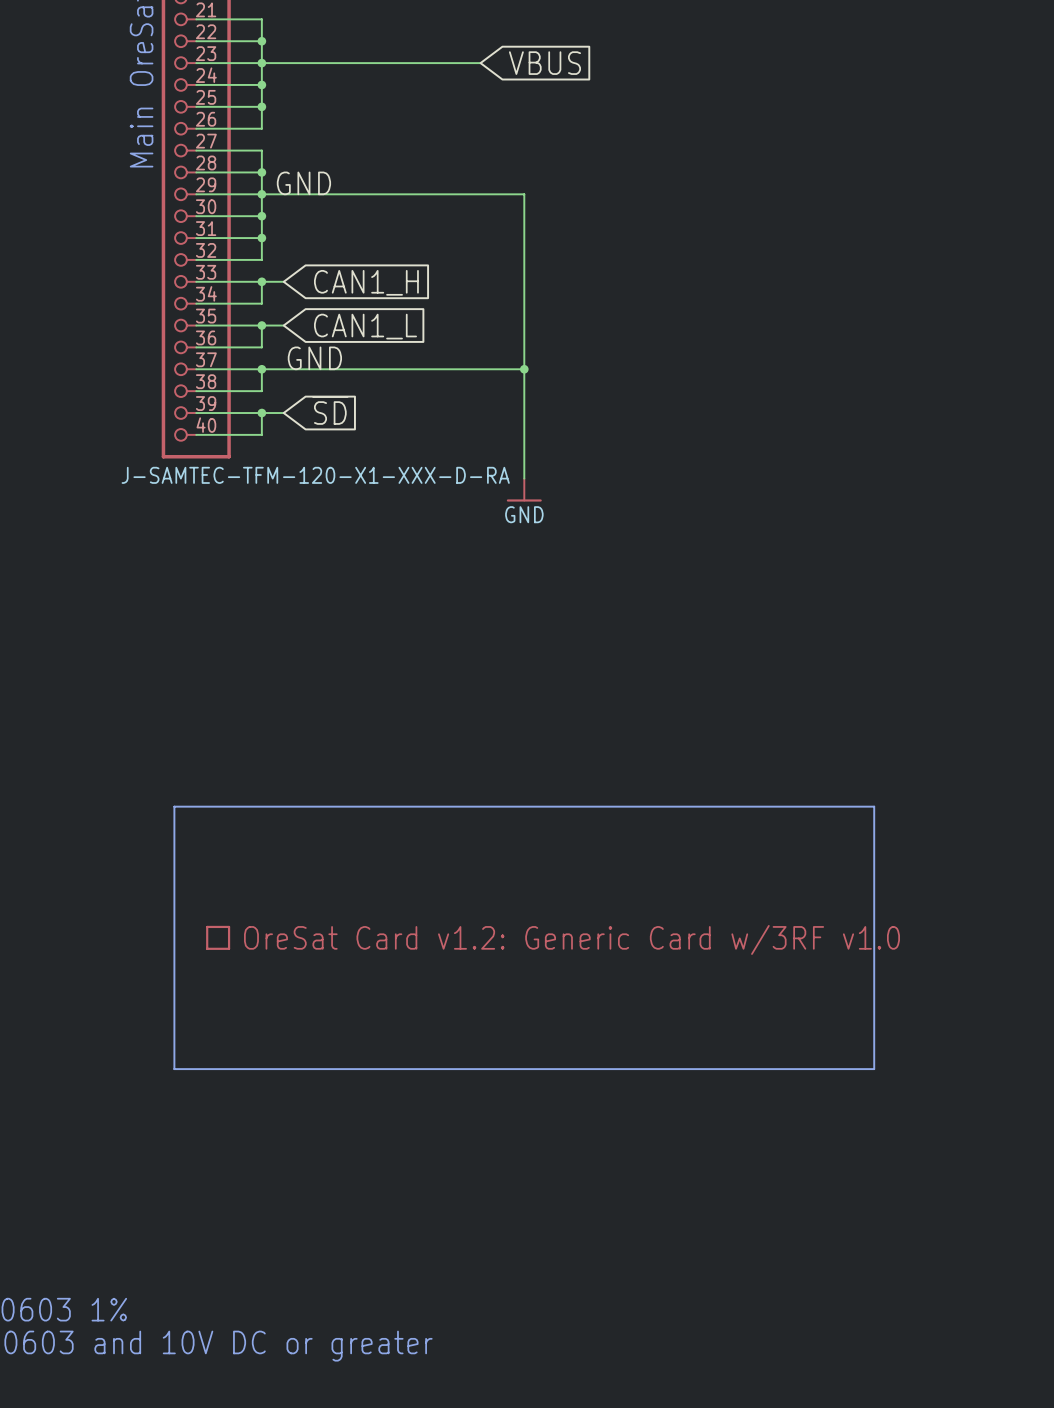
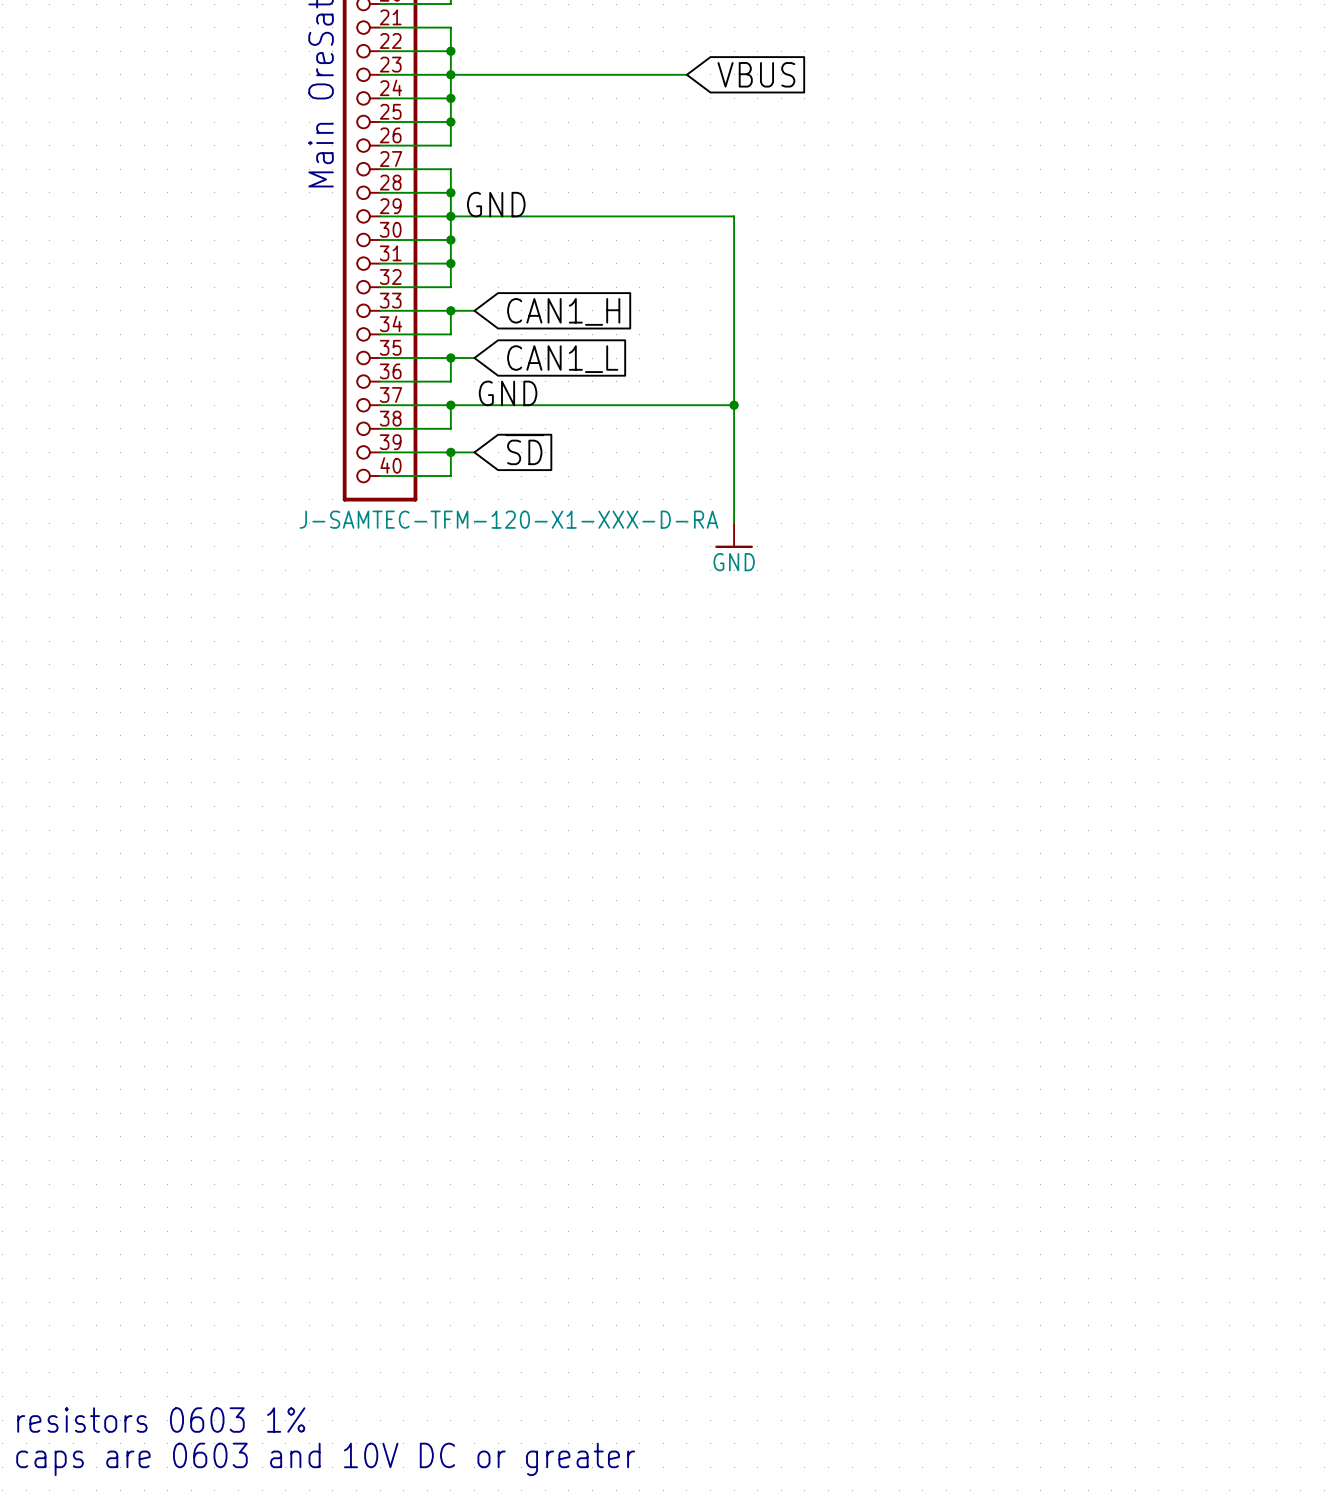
line: (174, 806) (874, 806) (874, 1069) (174, 1069) (174, 806) -> none
part: (218, 937) -> none

